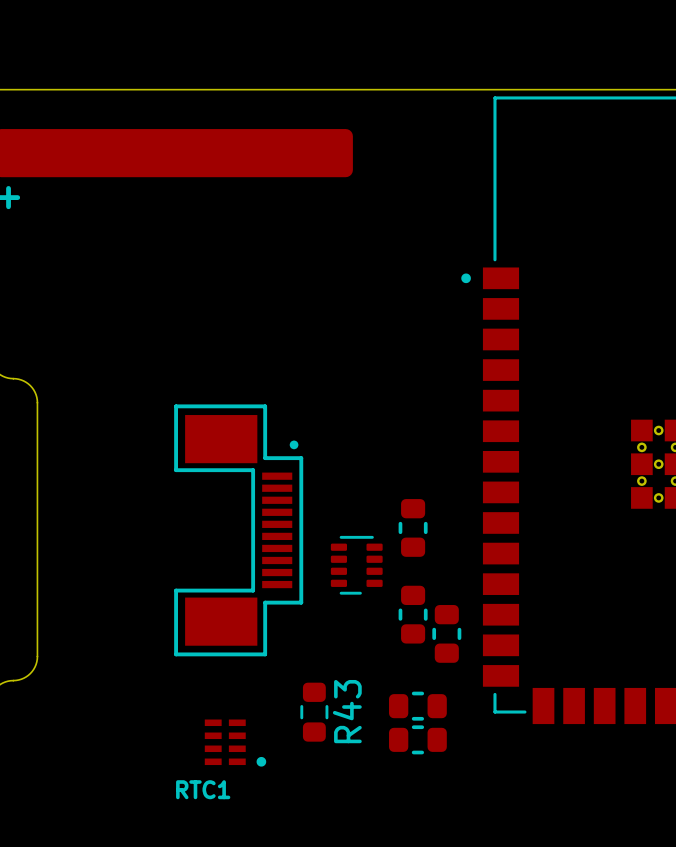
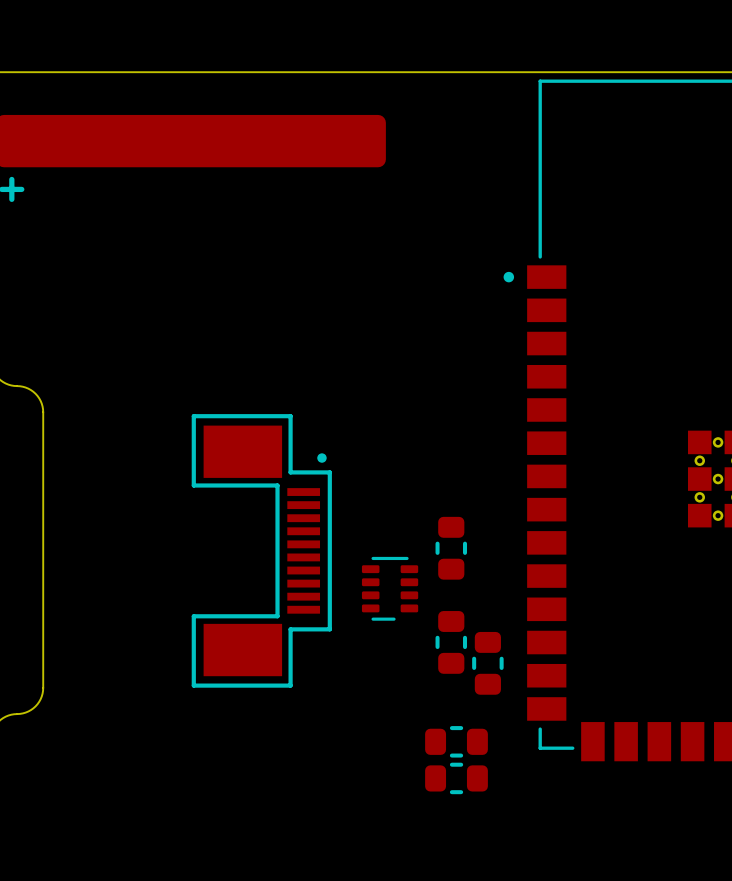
R43: (314, 712) -> none
RTC1: (235, 743) -> none

